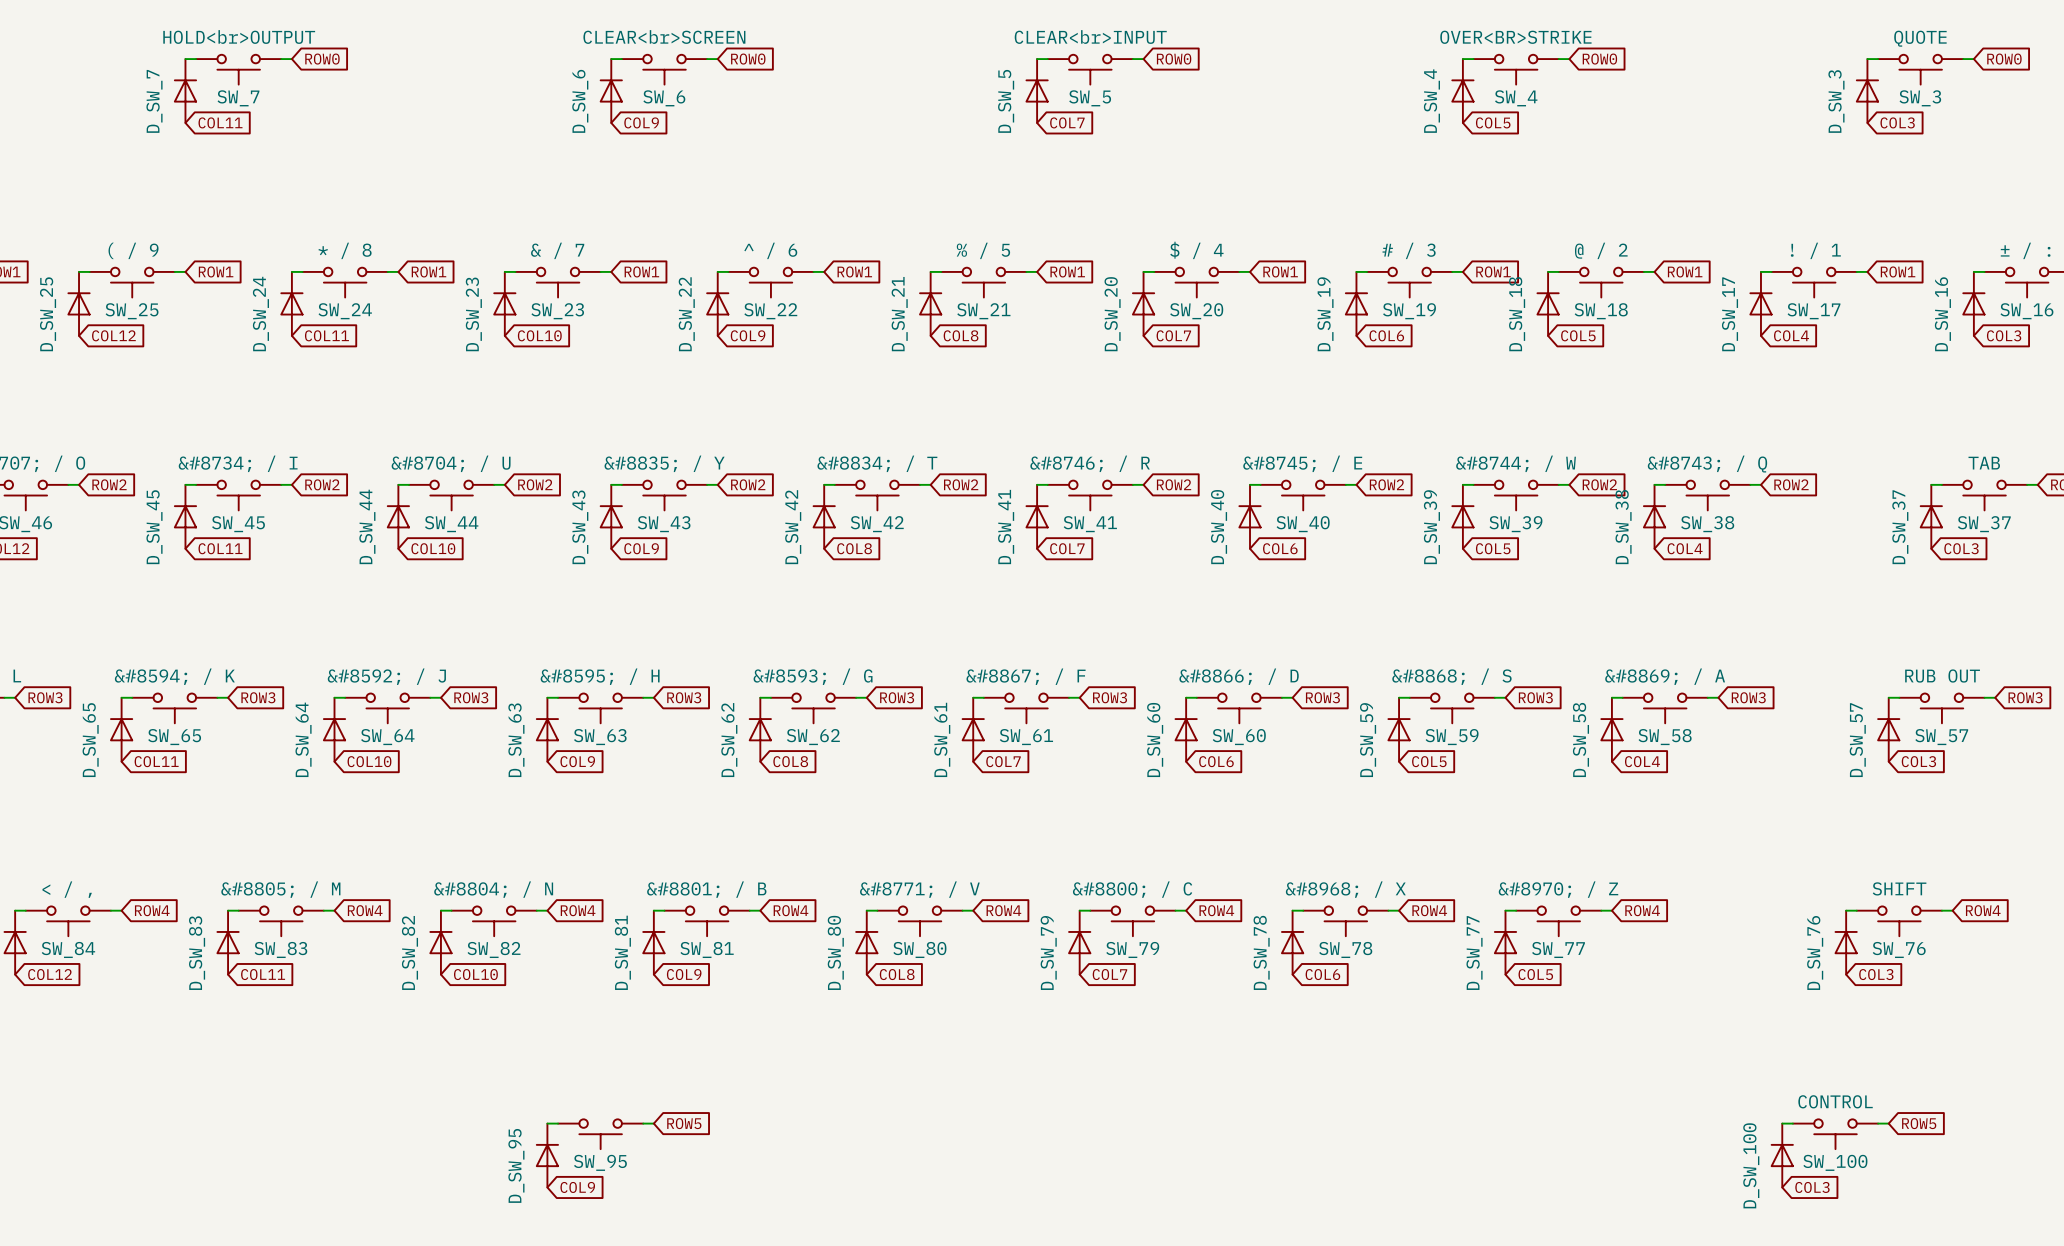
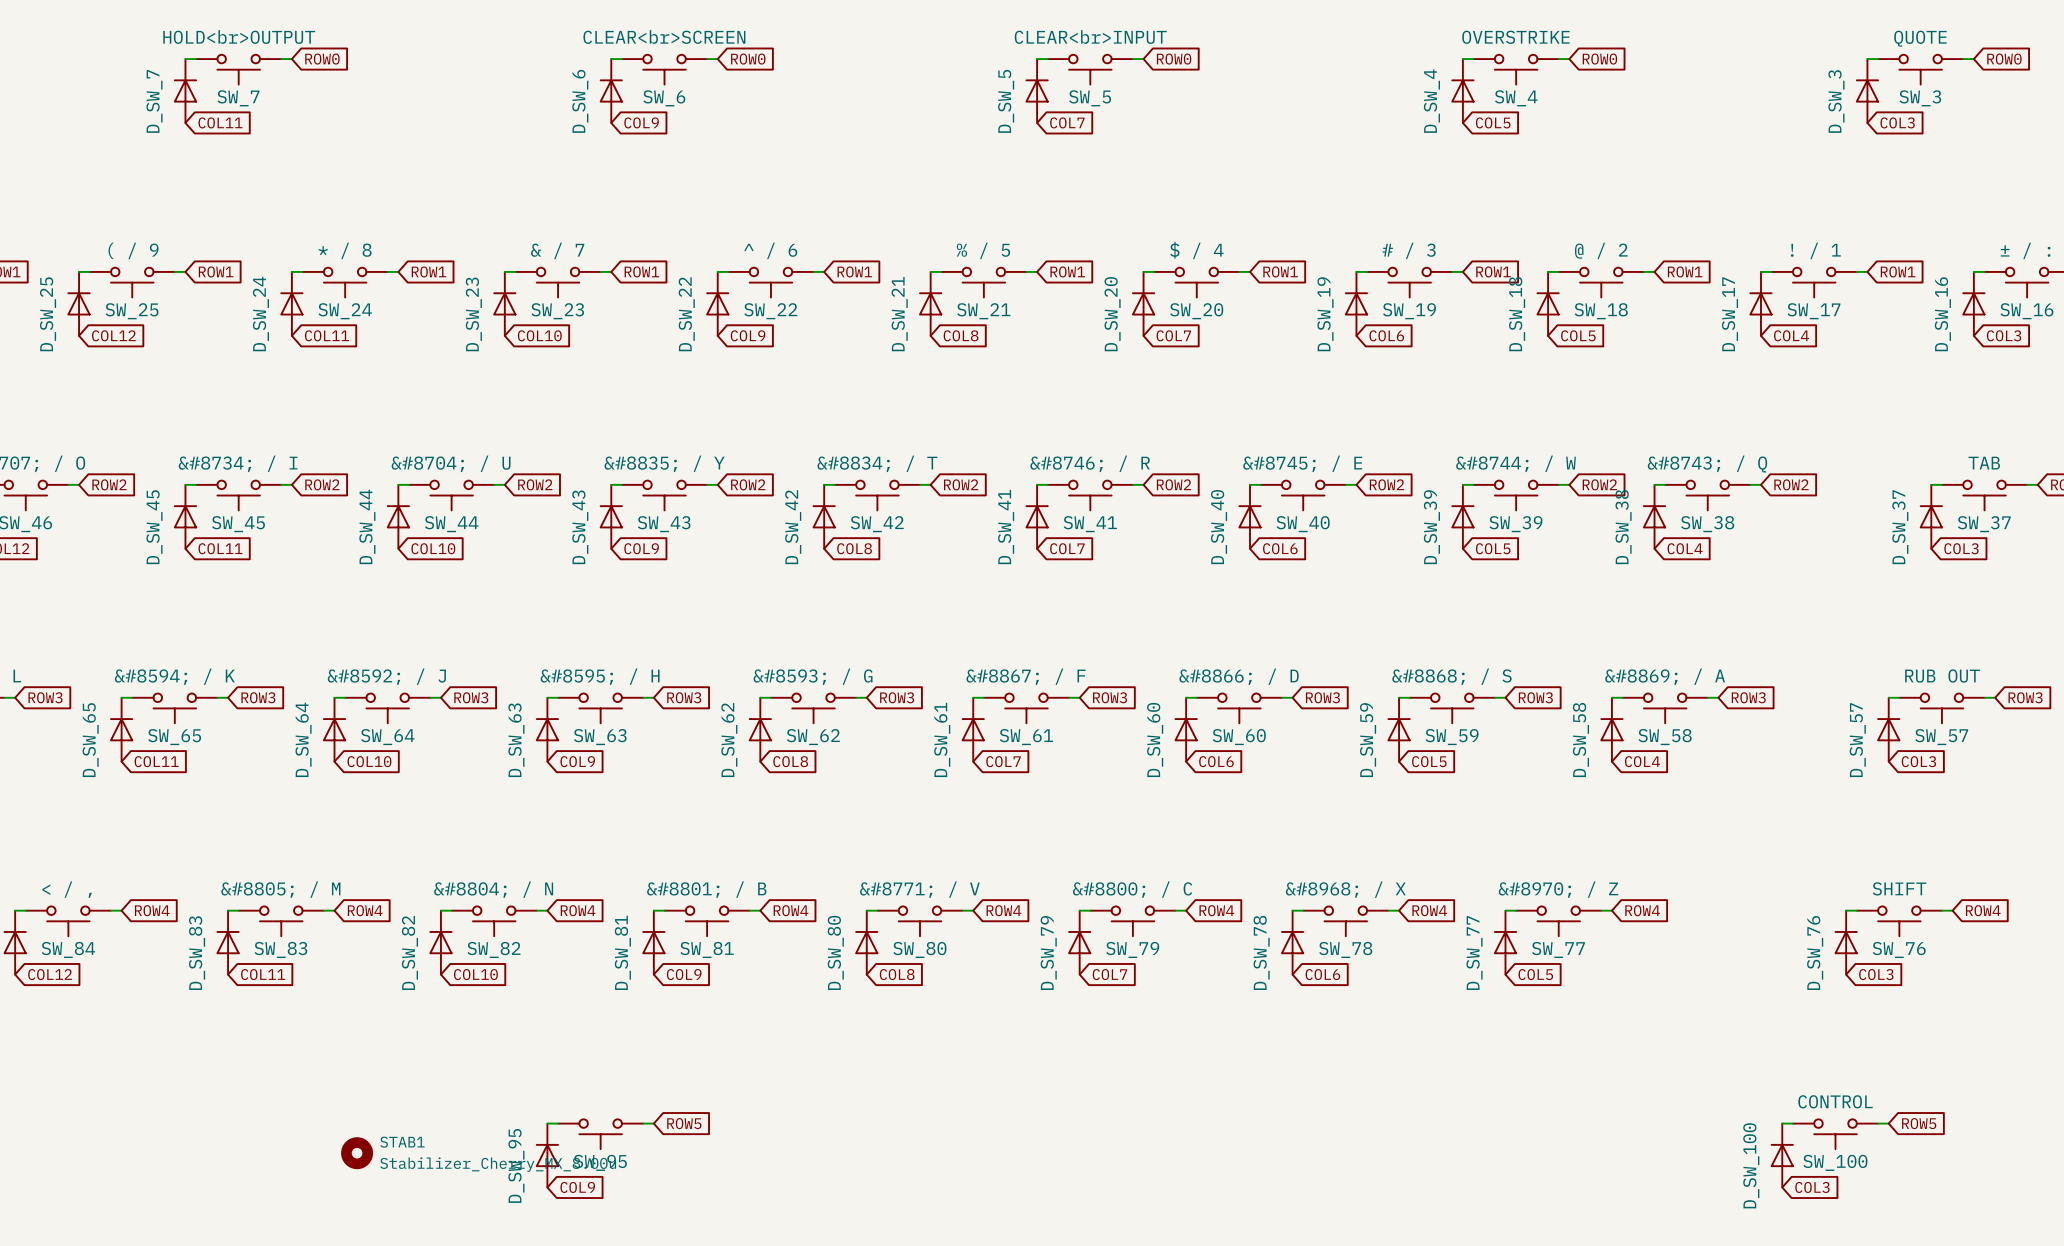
SW_4 value: OVER<BR>STRIKE (1515, 37) -> OVERSTRIKE (1515, 37)
STAB1: none -> Stabilizer_Cherry_MX_8.00u (357, 1153)

